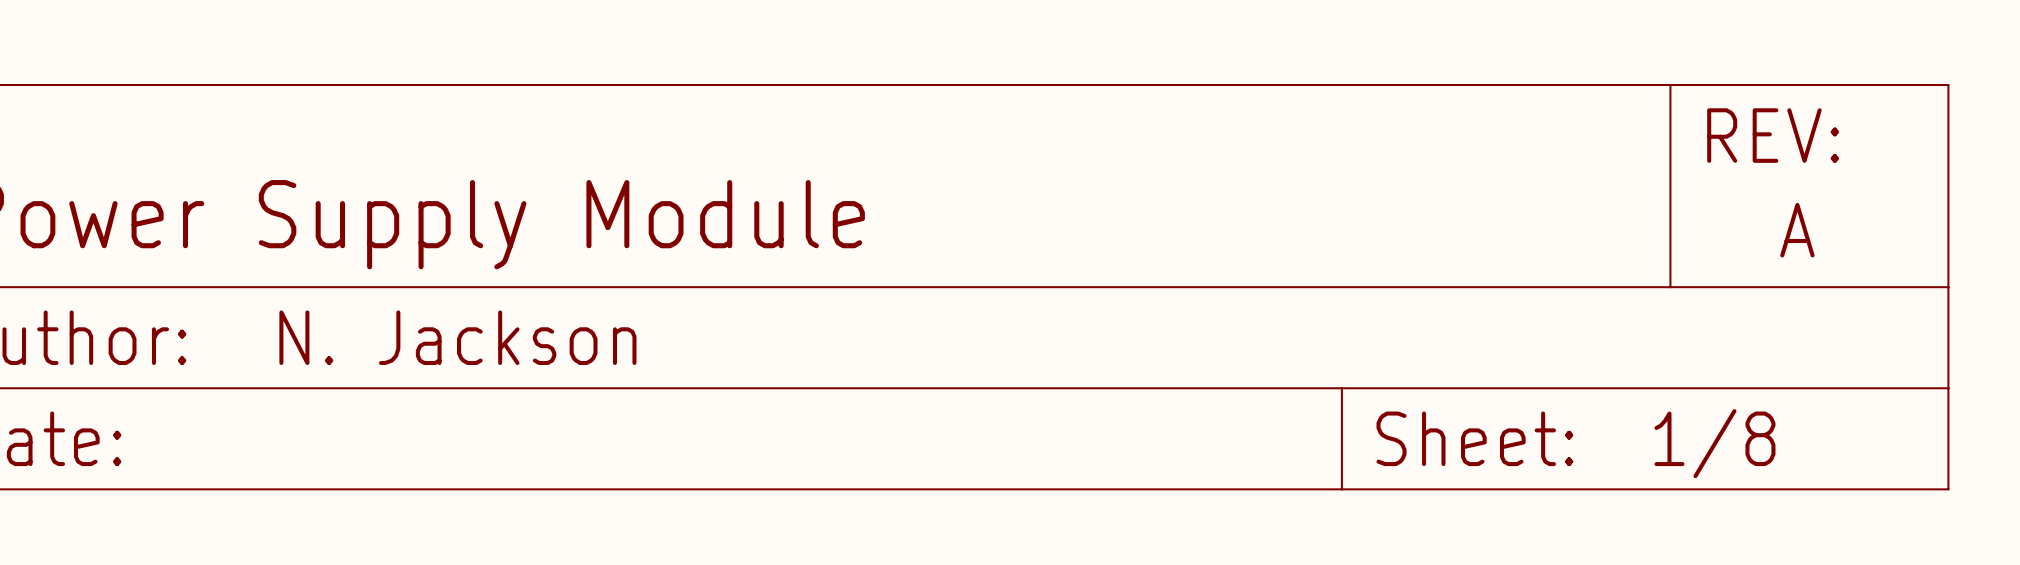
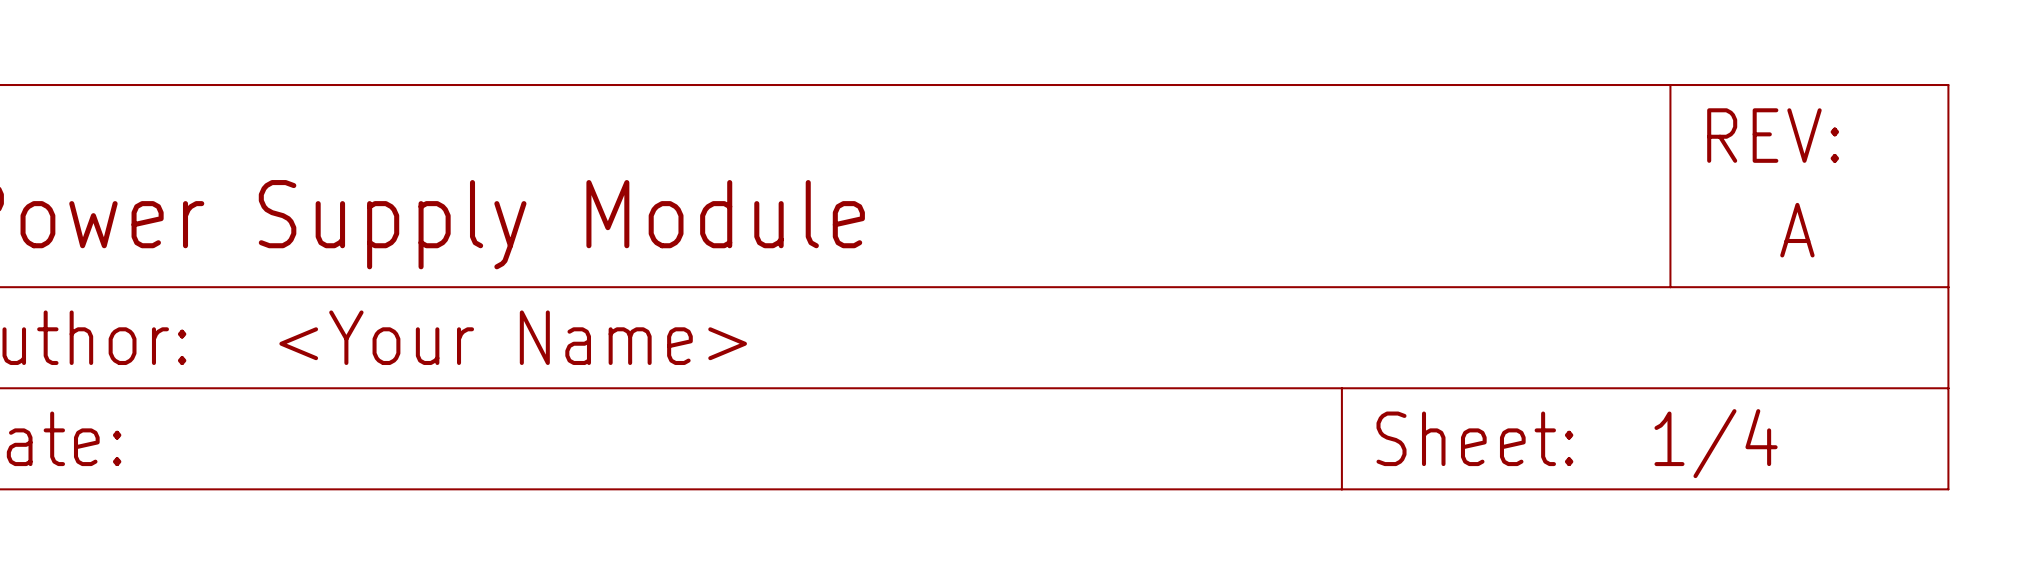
part text: N. Jackson (457, 337) -> <Your Name> (513, 337)
part text: 1/8 (1714, 443) -> 1/4 (1716, 443)

